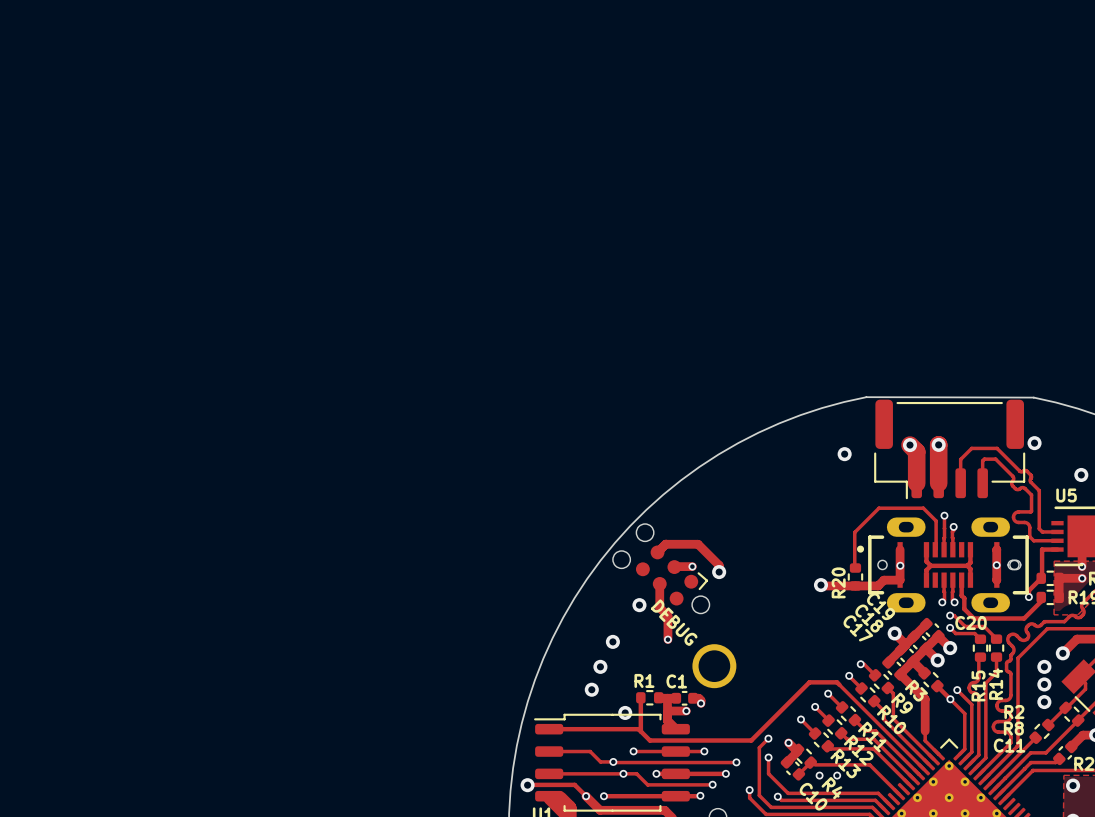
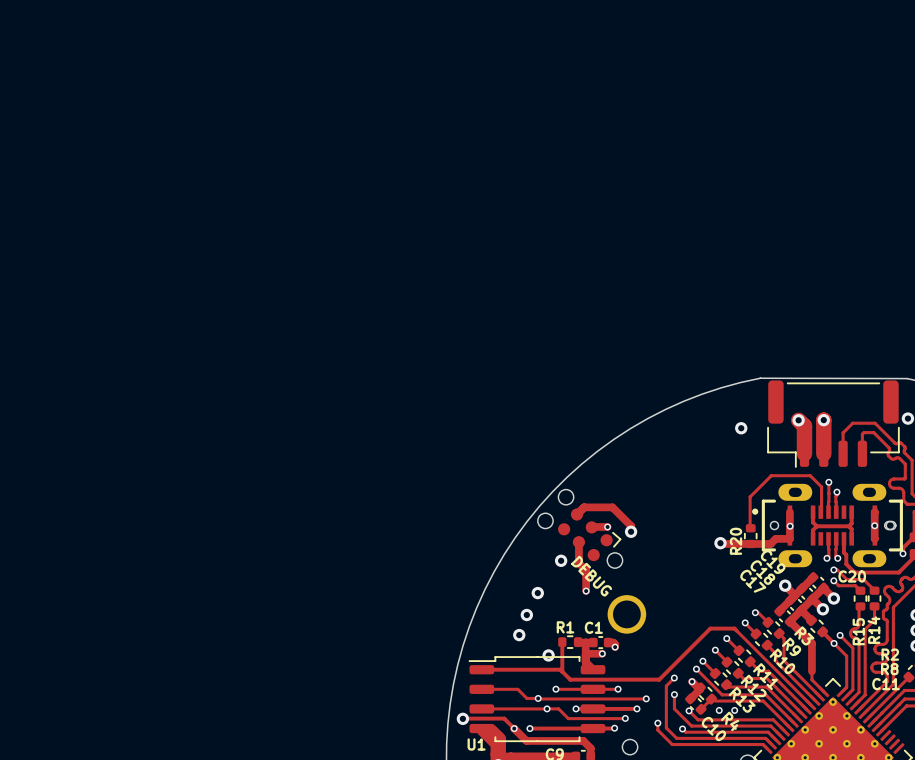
track: none -> (696, 669) (722, 694) (765, 694) (793, 722)
via: none -> (696, 669)
track: none -> (689, 710) (698, 719) (773, 719) (784, 731)
via: none -> (689, 710)

